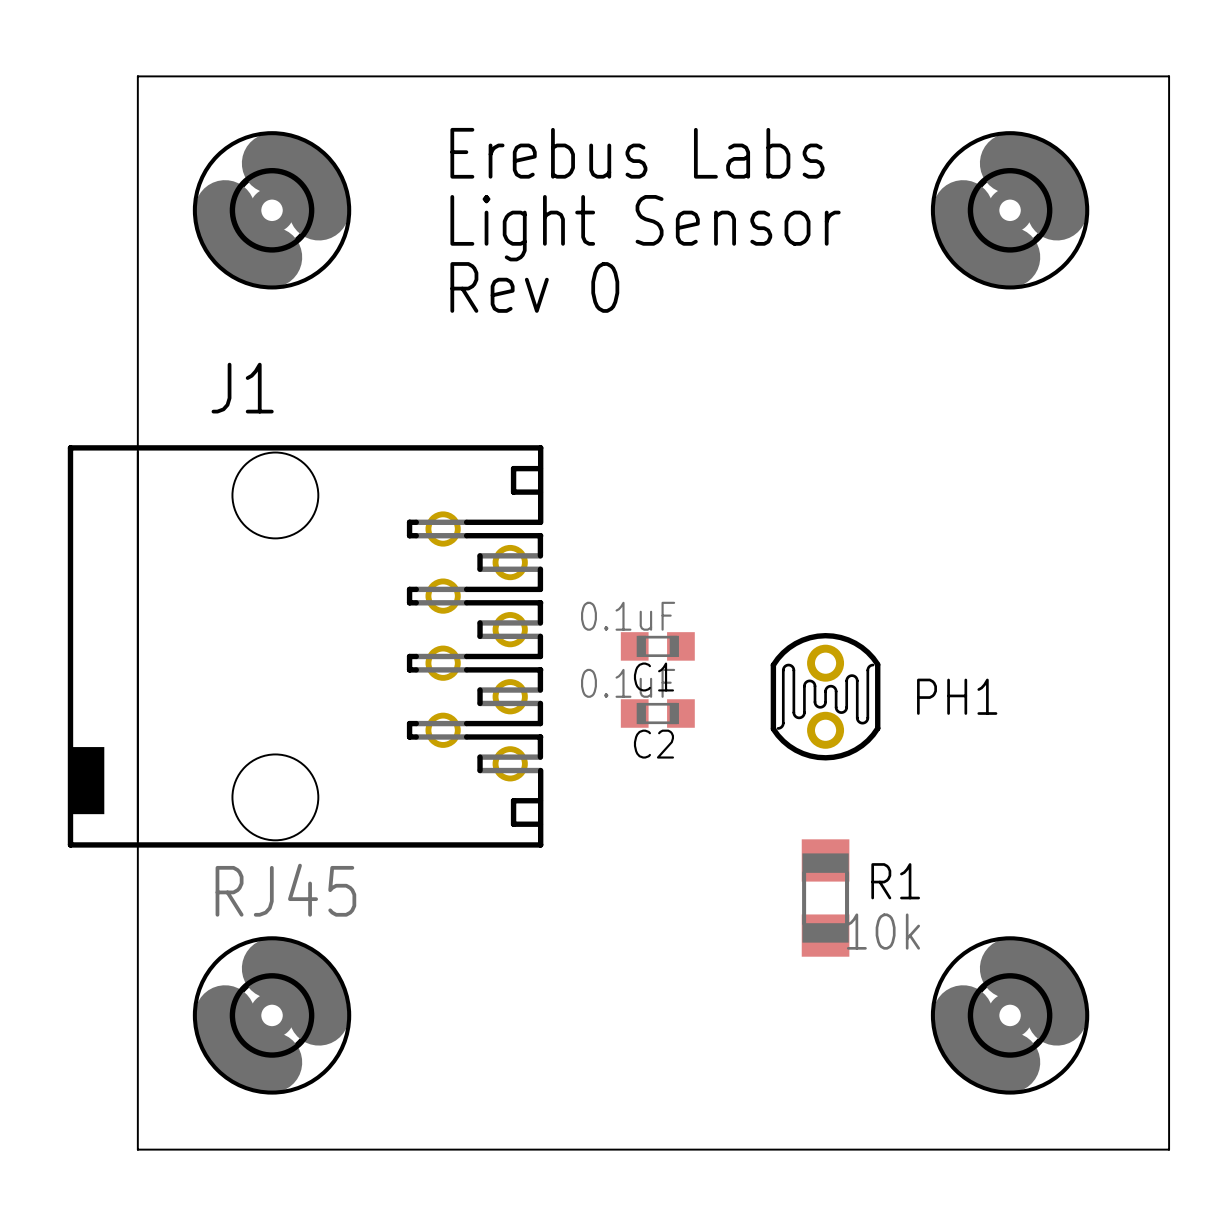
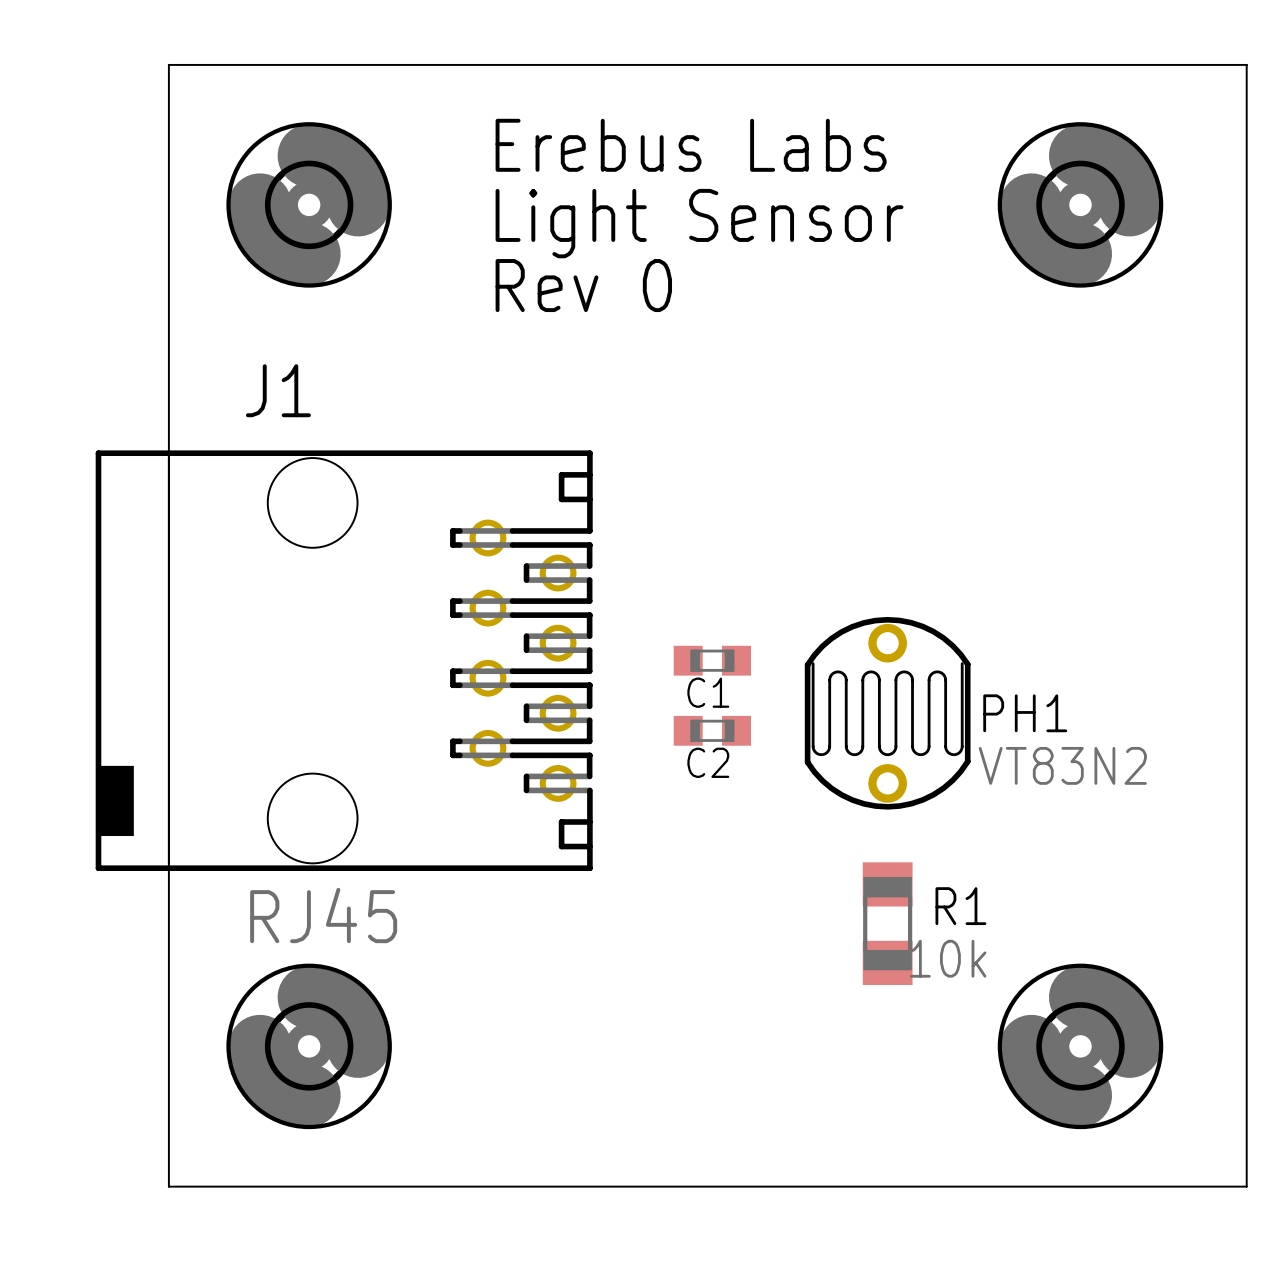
C1 value: 0.1uF (628, 616) -> none
PH1 footprint: [770, 632, 881, 761] -> [804, 616, 971, 810]
C2 value: 0.1uF (628, 683) -> none
PH1 value: none -> VT83N2 (1062, 765)

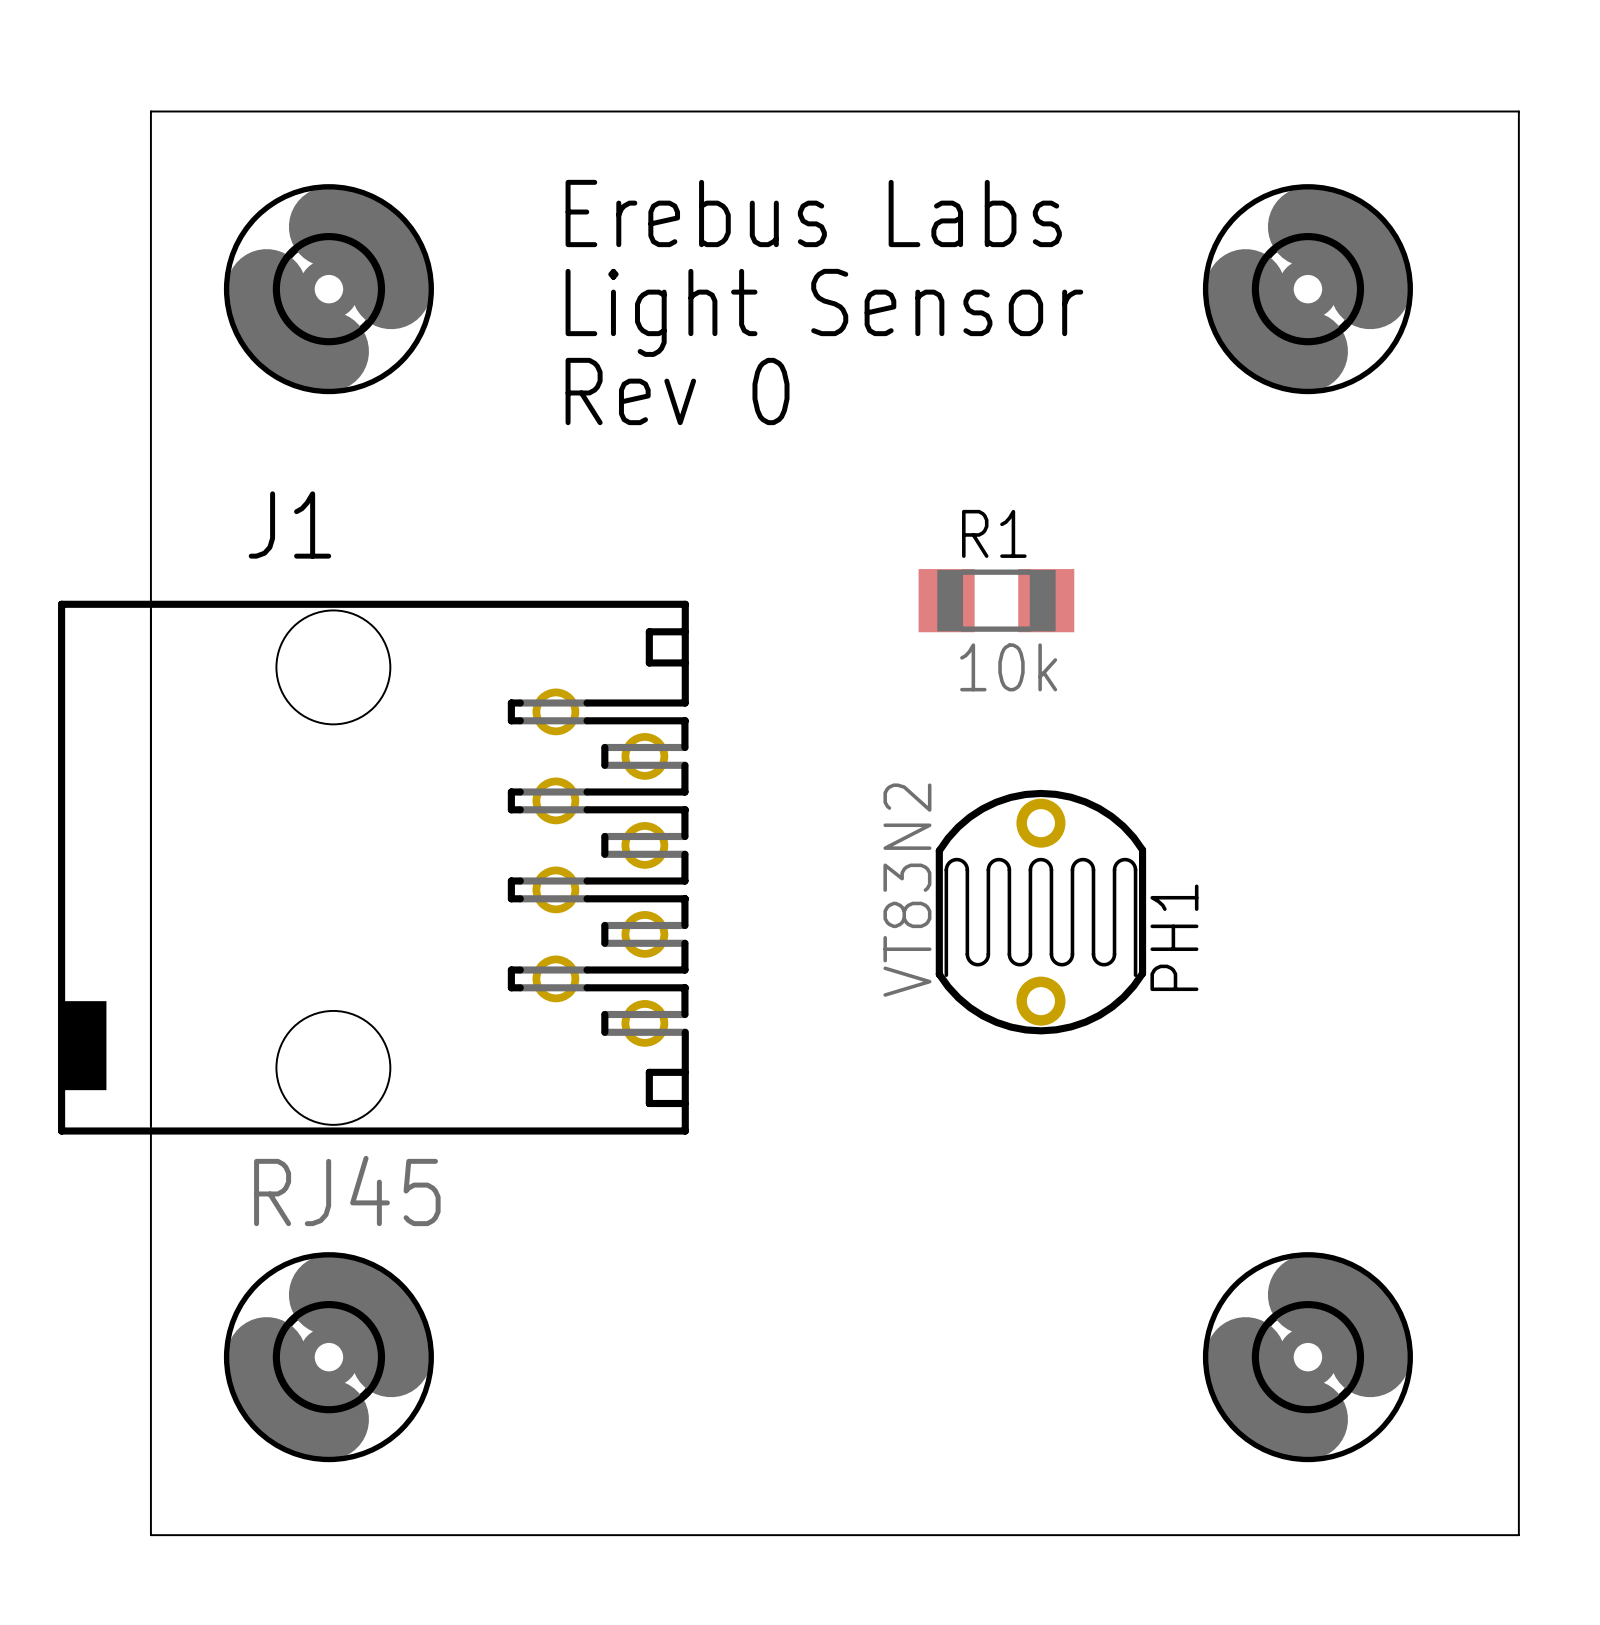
C1: (712, 660) -> none
PH1 rotation: 0° (887, 713) -> 180° (1040, 912)
C2: (712, 730) -> none
PH1 value position: VT83N2 (1062, 765) -> VT83N2 (907, 890)
R1 name position: R1 (960, 906) -> R1 (994, 533)
R1 rotation: 0° (887, 923) -> 90° clockwise (996, 600)
R1 position: (887, 923) -> (996, 600)

